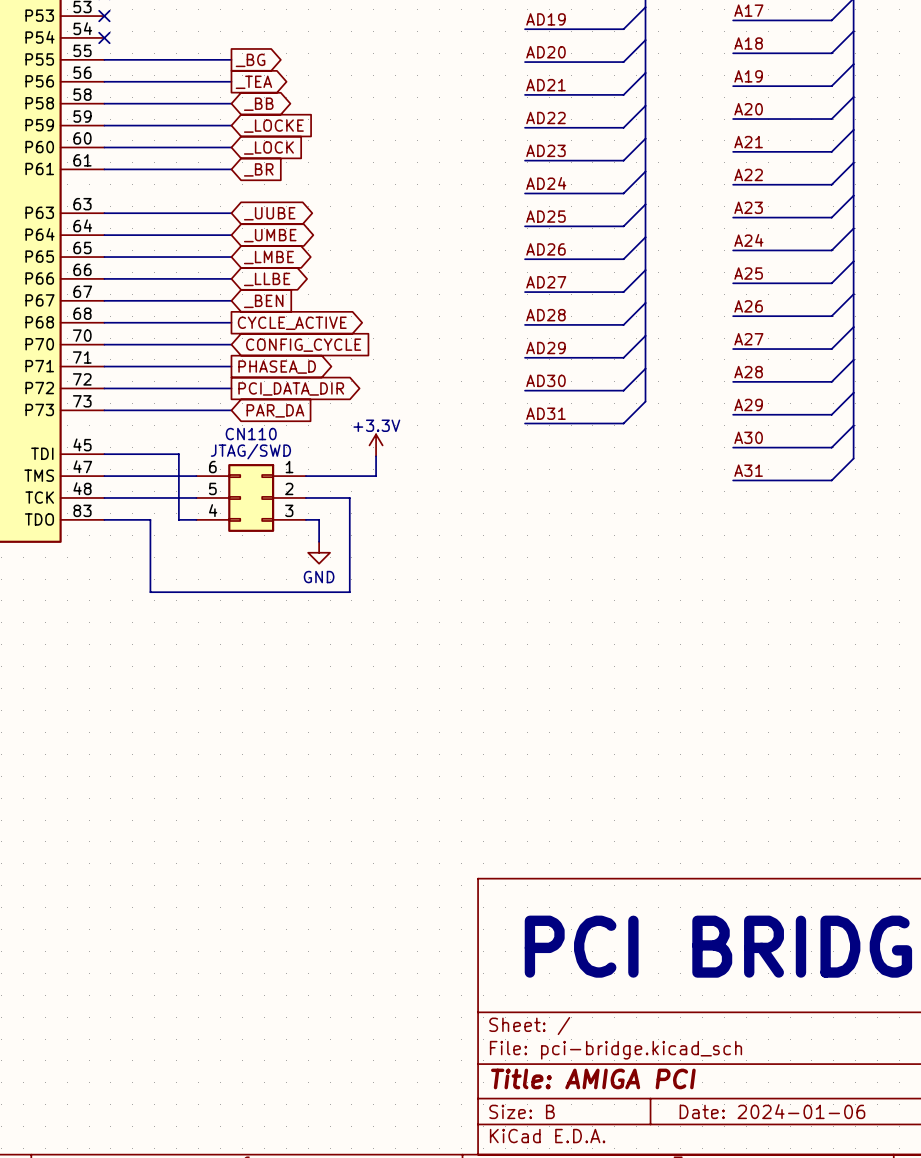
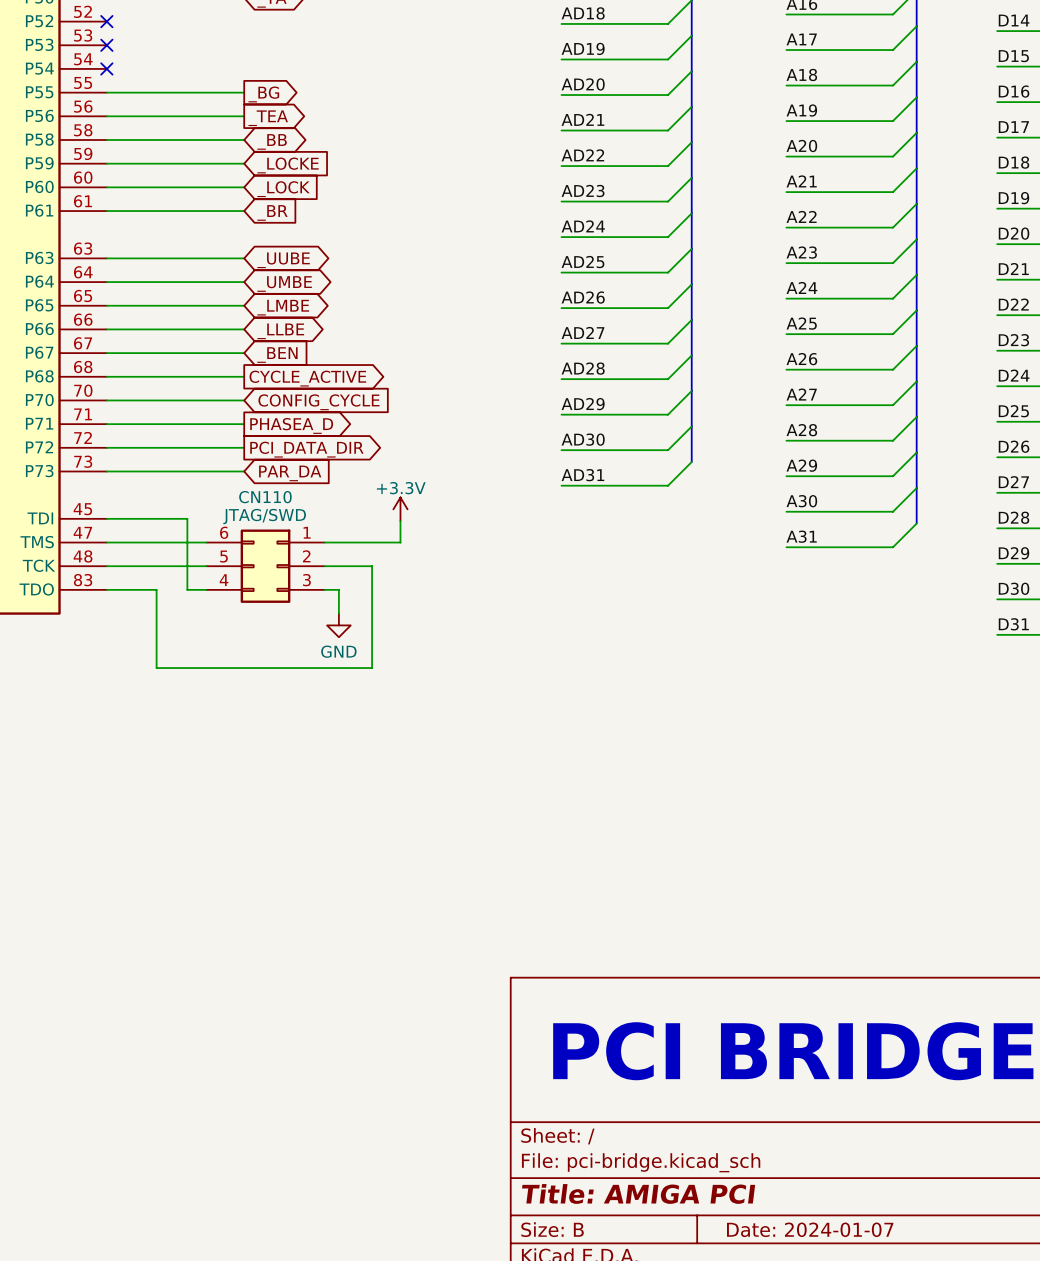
title block: Date: 2024-01-06 (772, 1111) -> Date: 2024-01-07 (810, 1229)

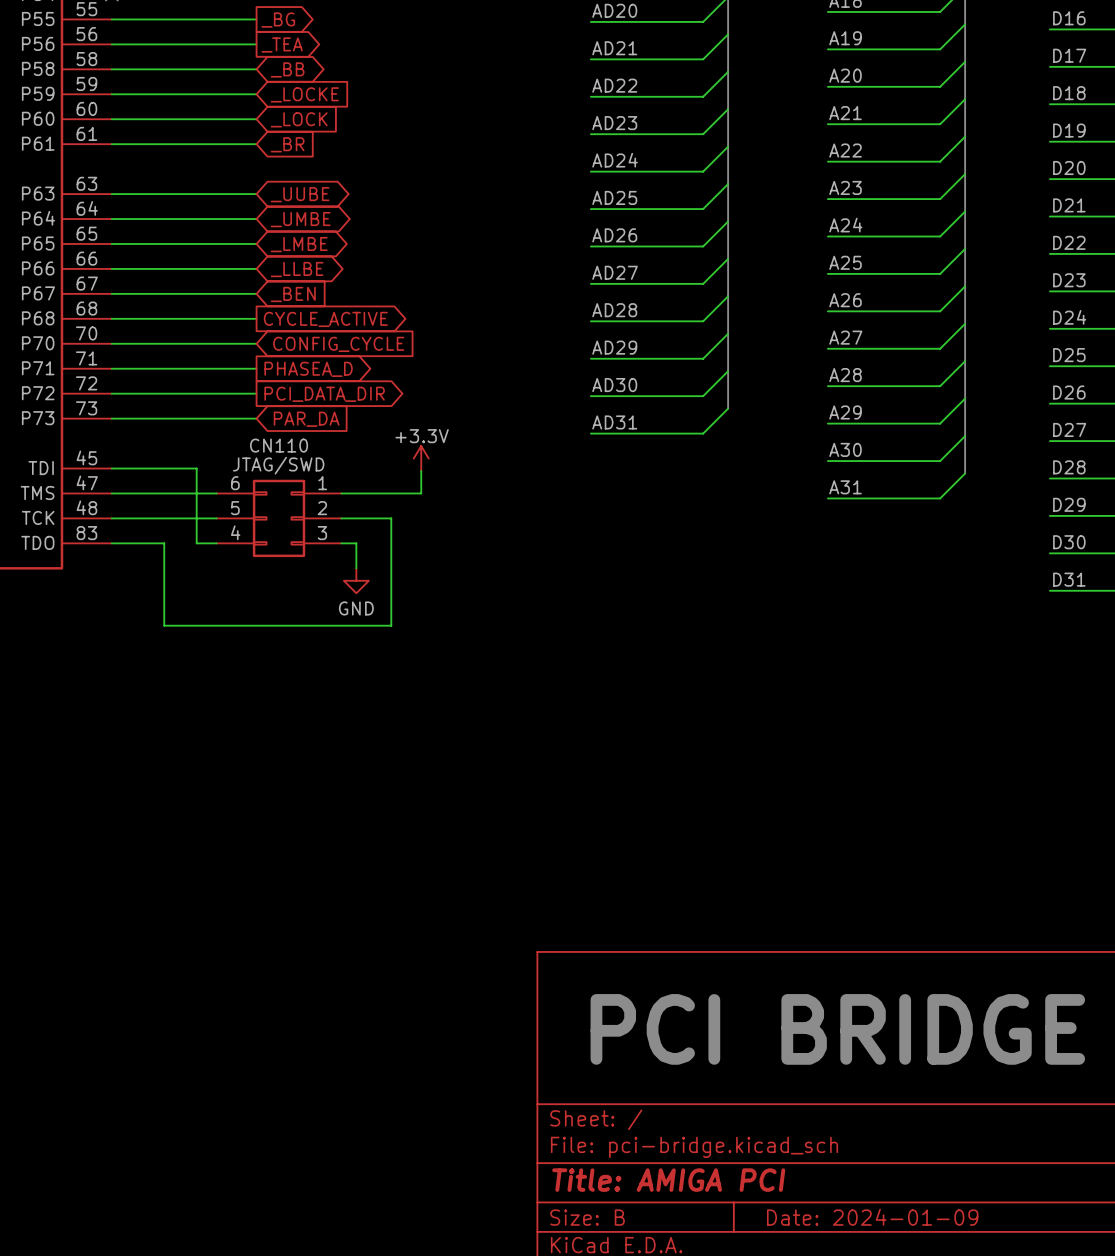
title block: Date: 2024-01-07 (810, 1229) -> Date: 2024-01-09 (872, 1217)

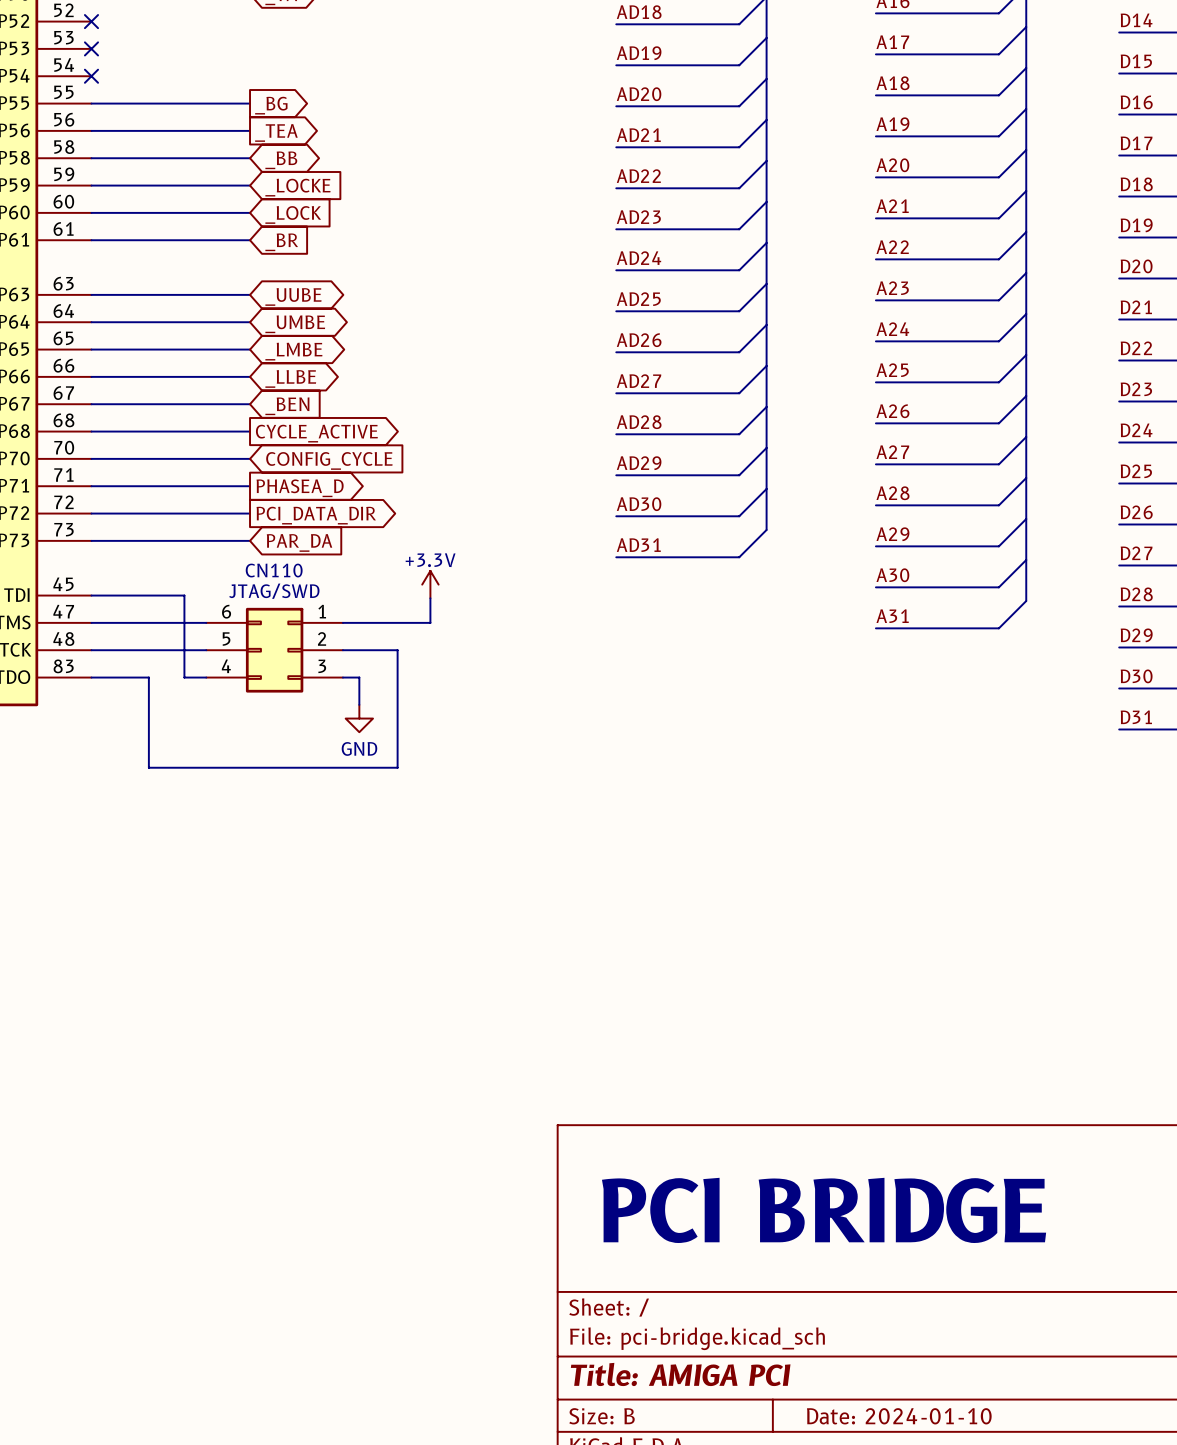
title block: Date: 2024-01-09 (872, 1217) -> Date: 2024-01-10 (899, 1416)

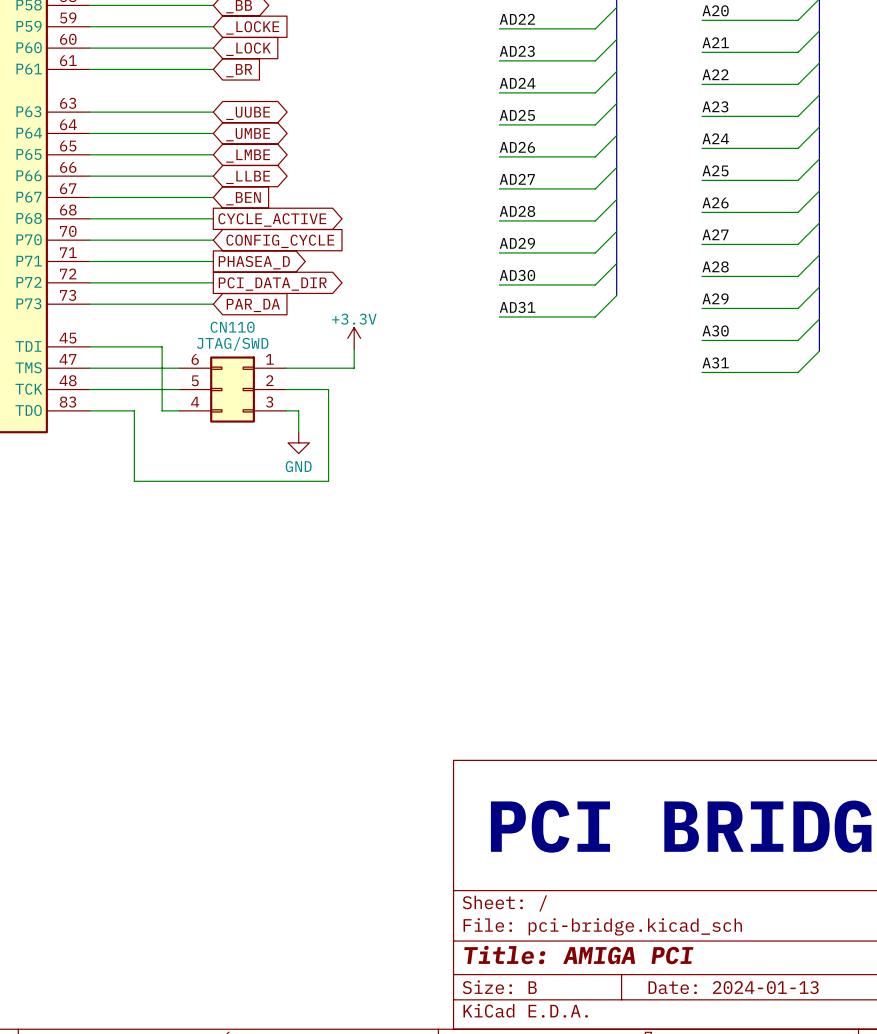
title block: Date: 2024-01-10 (899, 1416) -> Date: 2024-01-13 (733, 987)

